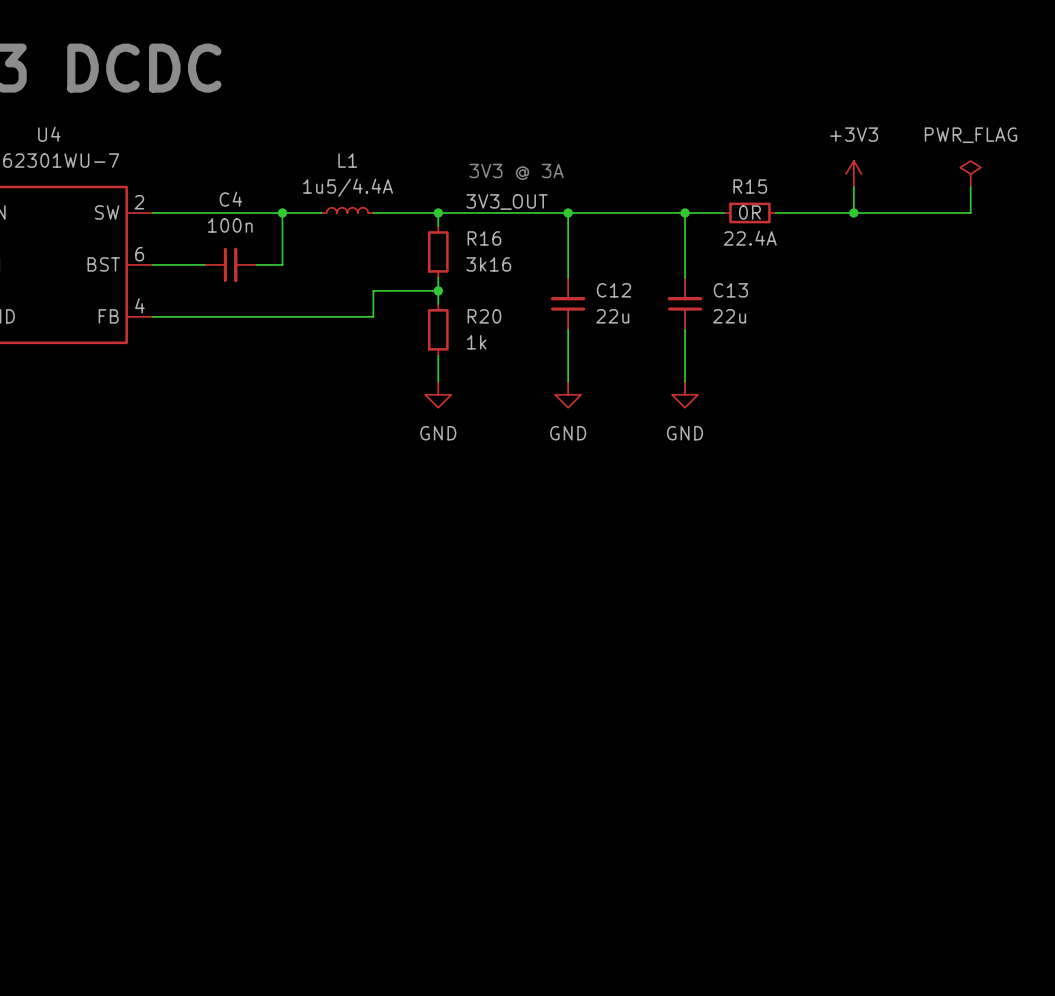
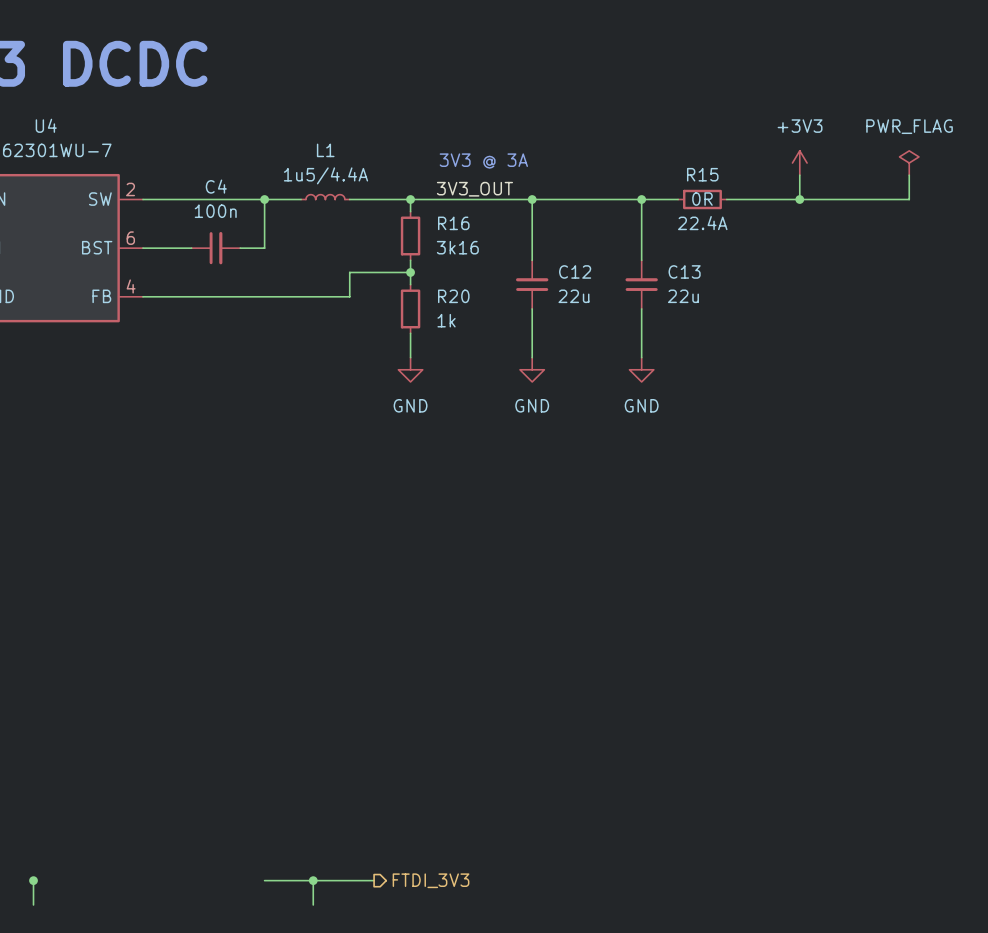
wire: none -> (33, 880) (33, 904)
junction: none -> (33, 880)
wire: none -> (264, 880) (374, 880)
wire: none -> (313, 880) (313, 904)
junction: none -> (313, 880)
hierarchical label: none -> FTDI_3V3 (431, 880)

